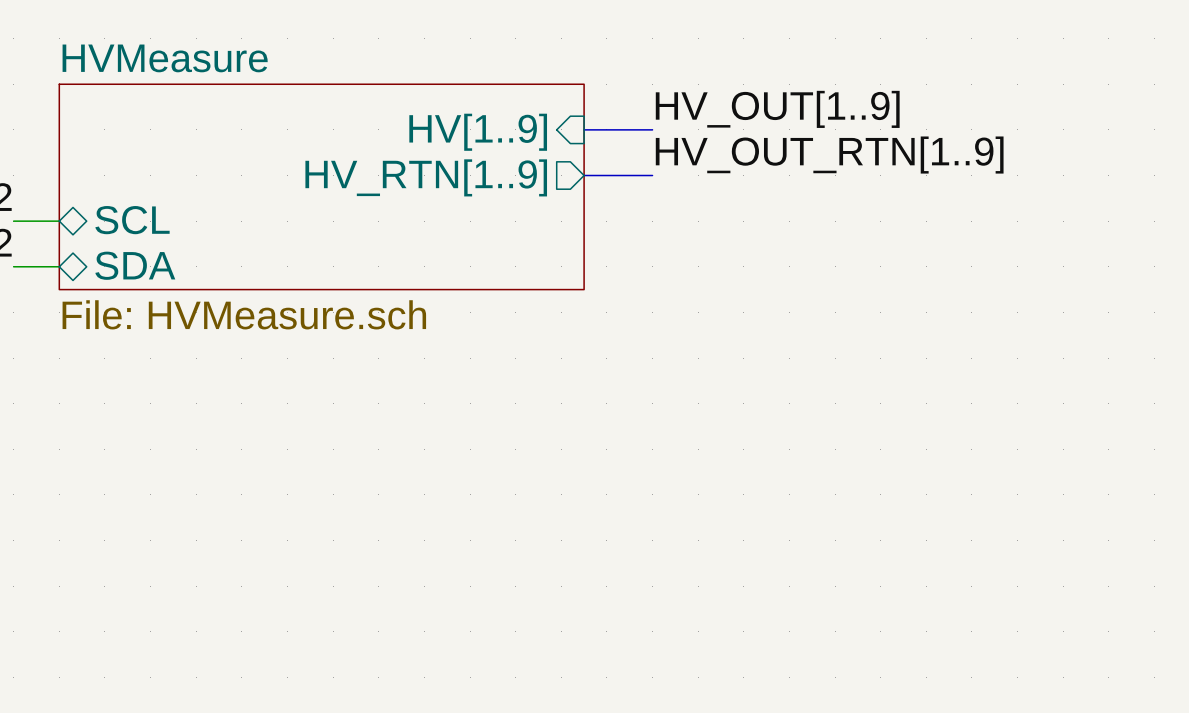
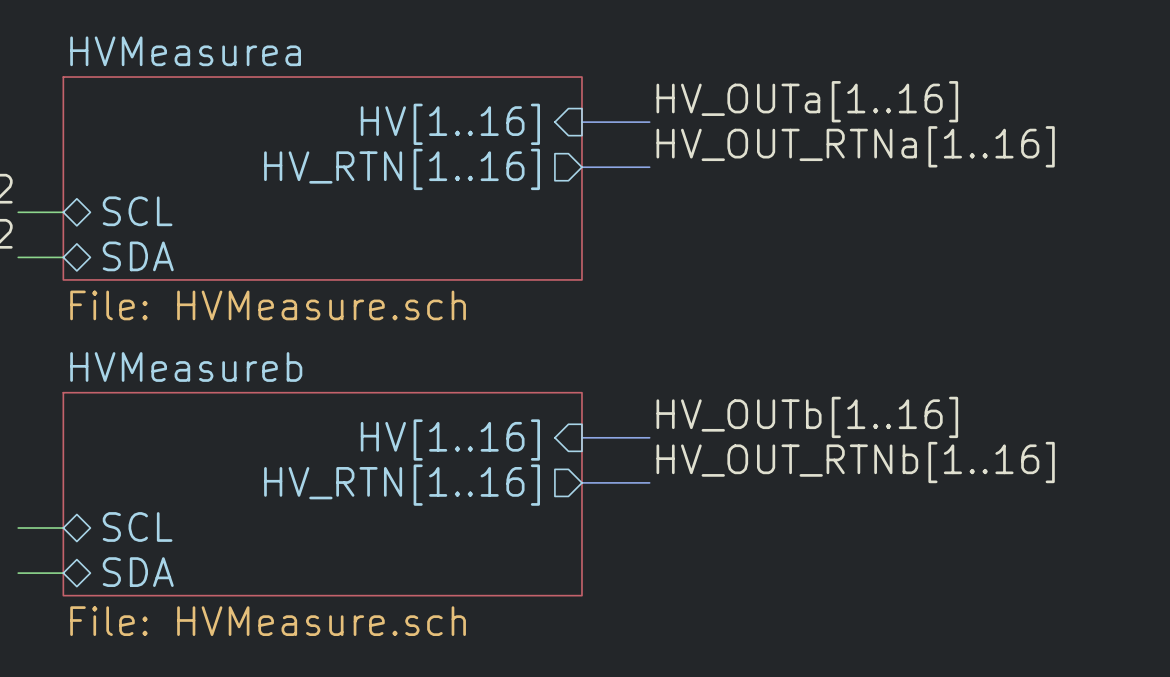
sheet HVMeasure name: HVMeasure (165, 58) -> HVMeasurea (185, 51)
label: HV_OUT[1..9] (777, 109) -> HV_OUTa[1..16] (807, 101)
sheet pin: HV[1..9] (478, 132) -> HV[1..16] (450, 124)
label: HV_OUT_RTN[1..9] (829, 155) -> HV_OUT_RTNa[1..16] (855, 146)
sheet pin: HV_RTN[1..9] (426, 177) -> HV_RTN[1..16] (402, 169)
label: none -> HV_OUTb[1..16] (807, 417)
bus: none -> (581, 437) (649, 437)
sheet pin: none -> HV[1..16] (450, 440)
label: none -> HV_OUT_RTNb[1..16] (855, 462)
bus: none -> (581, 482) (649, 482)
sheet pin: none -> HV_RTN[1..16] (402, 485)
sheet HVMeasureb: none -> File: HVMeasure.sch (322, 494)
sheet pin: none -> SCL (137, 526)
wire: none -> (18, 528) (63, 528)
sheet pin: none -> SDA (138, 572)
wire: none -> (18, 573) (63, 573)

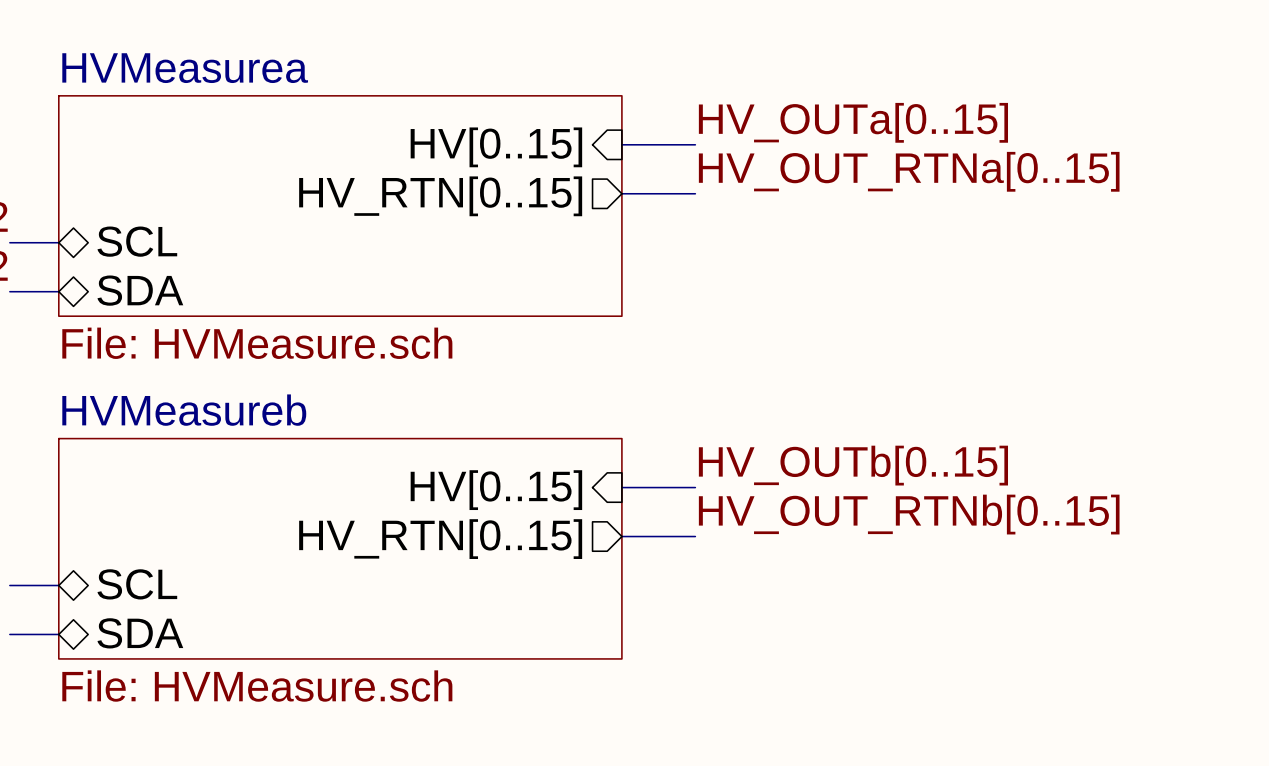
label: HV_OUTa[1..16] (807, 101) -> HV_OUTa[0..15] (853, 122)
sheet pin: HV[1..16] (450, 124) -> HV[0..15] (496, 147)
label: HV_OUT_RTNa[1..16] (855, 146) -> HV_OUT_RTNa[0..15] (909, 171)
sheet pin: HV_RTN[1..16] (402, 169) -> HV_RTN[0..15] (440, 196)
label: HV_OUTb[1..16] (807, 417) -> HV_OUTb[0..15] (853, 465)
sheet pin: HV[1..16] (450, 440) -> HV[0..15] (496, 490)
label: HV_OUT_RTNb[1..16] (855, 462) -> HV_OUT_RTNb[0..15] (909, 514)
sheet pin: HV_RTN[1..16] (402, 485) -> HV_RTN[0..15] (440, 539)

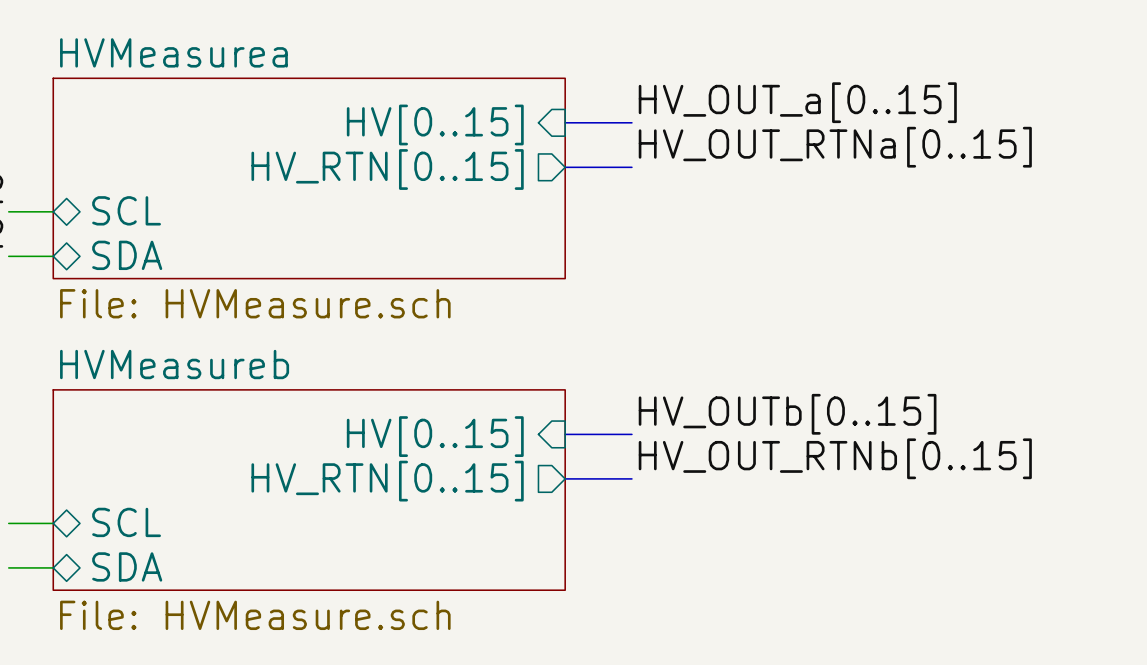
label: HV_OUTa[0..15] (853, 122) -> HV_OUT_a[0..15] (797, 102)

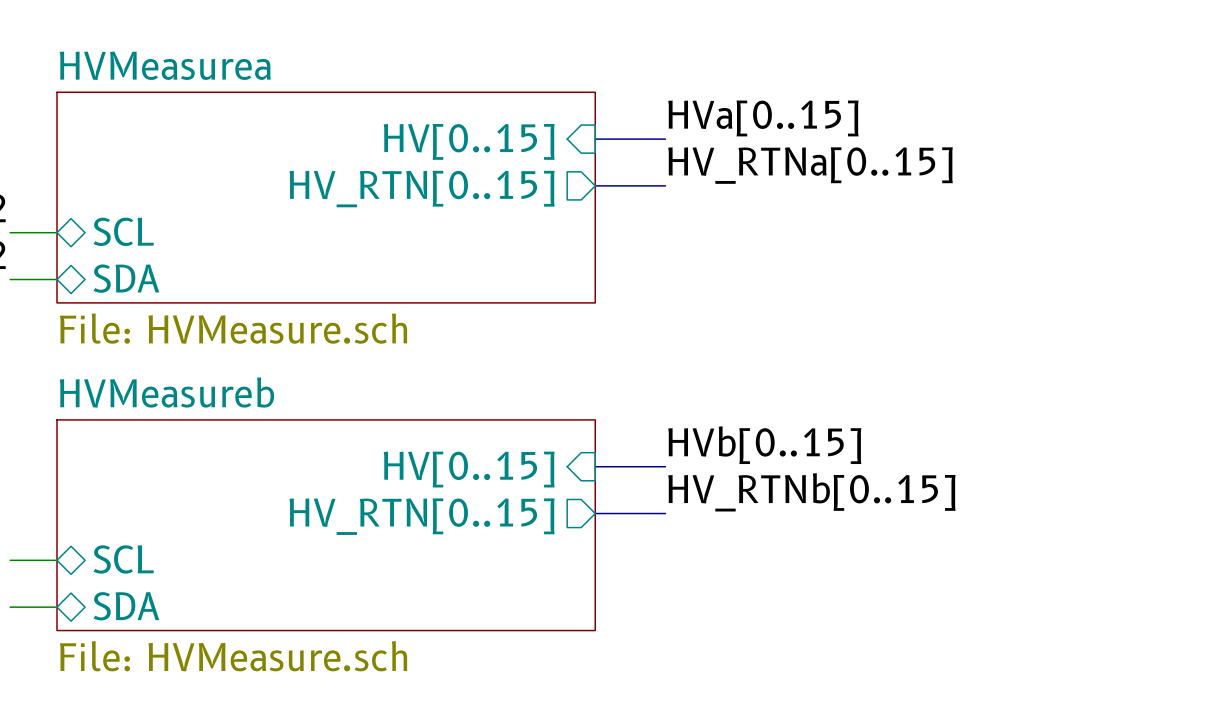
label: HV_OUT_a[0..15] (797, 102) -> HVa[0..15] (763, 118)
label: HV_OUT_RTNa[0..15] (835, 147) -> HV_RTNa[0..15] (810, 165)
label: HV_OUTb[0..15] (787, 414) -> HVb[0..15] (764, 445)
label: HV_OUT_RTNb[0..15] (835, 458) -> HV_RTNb[0..15] (811, 492)

